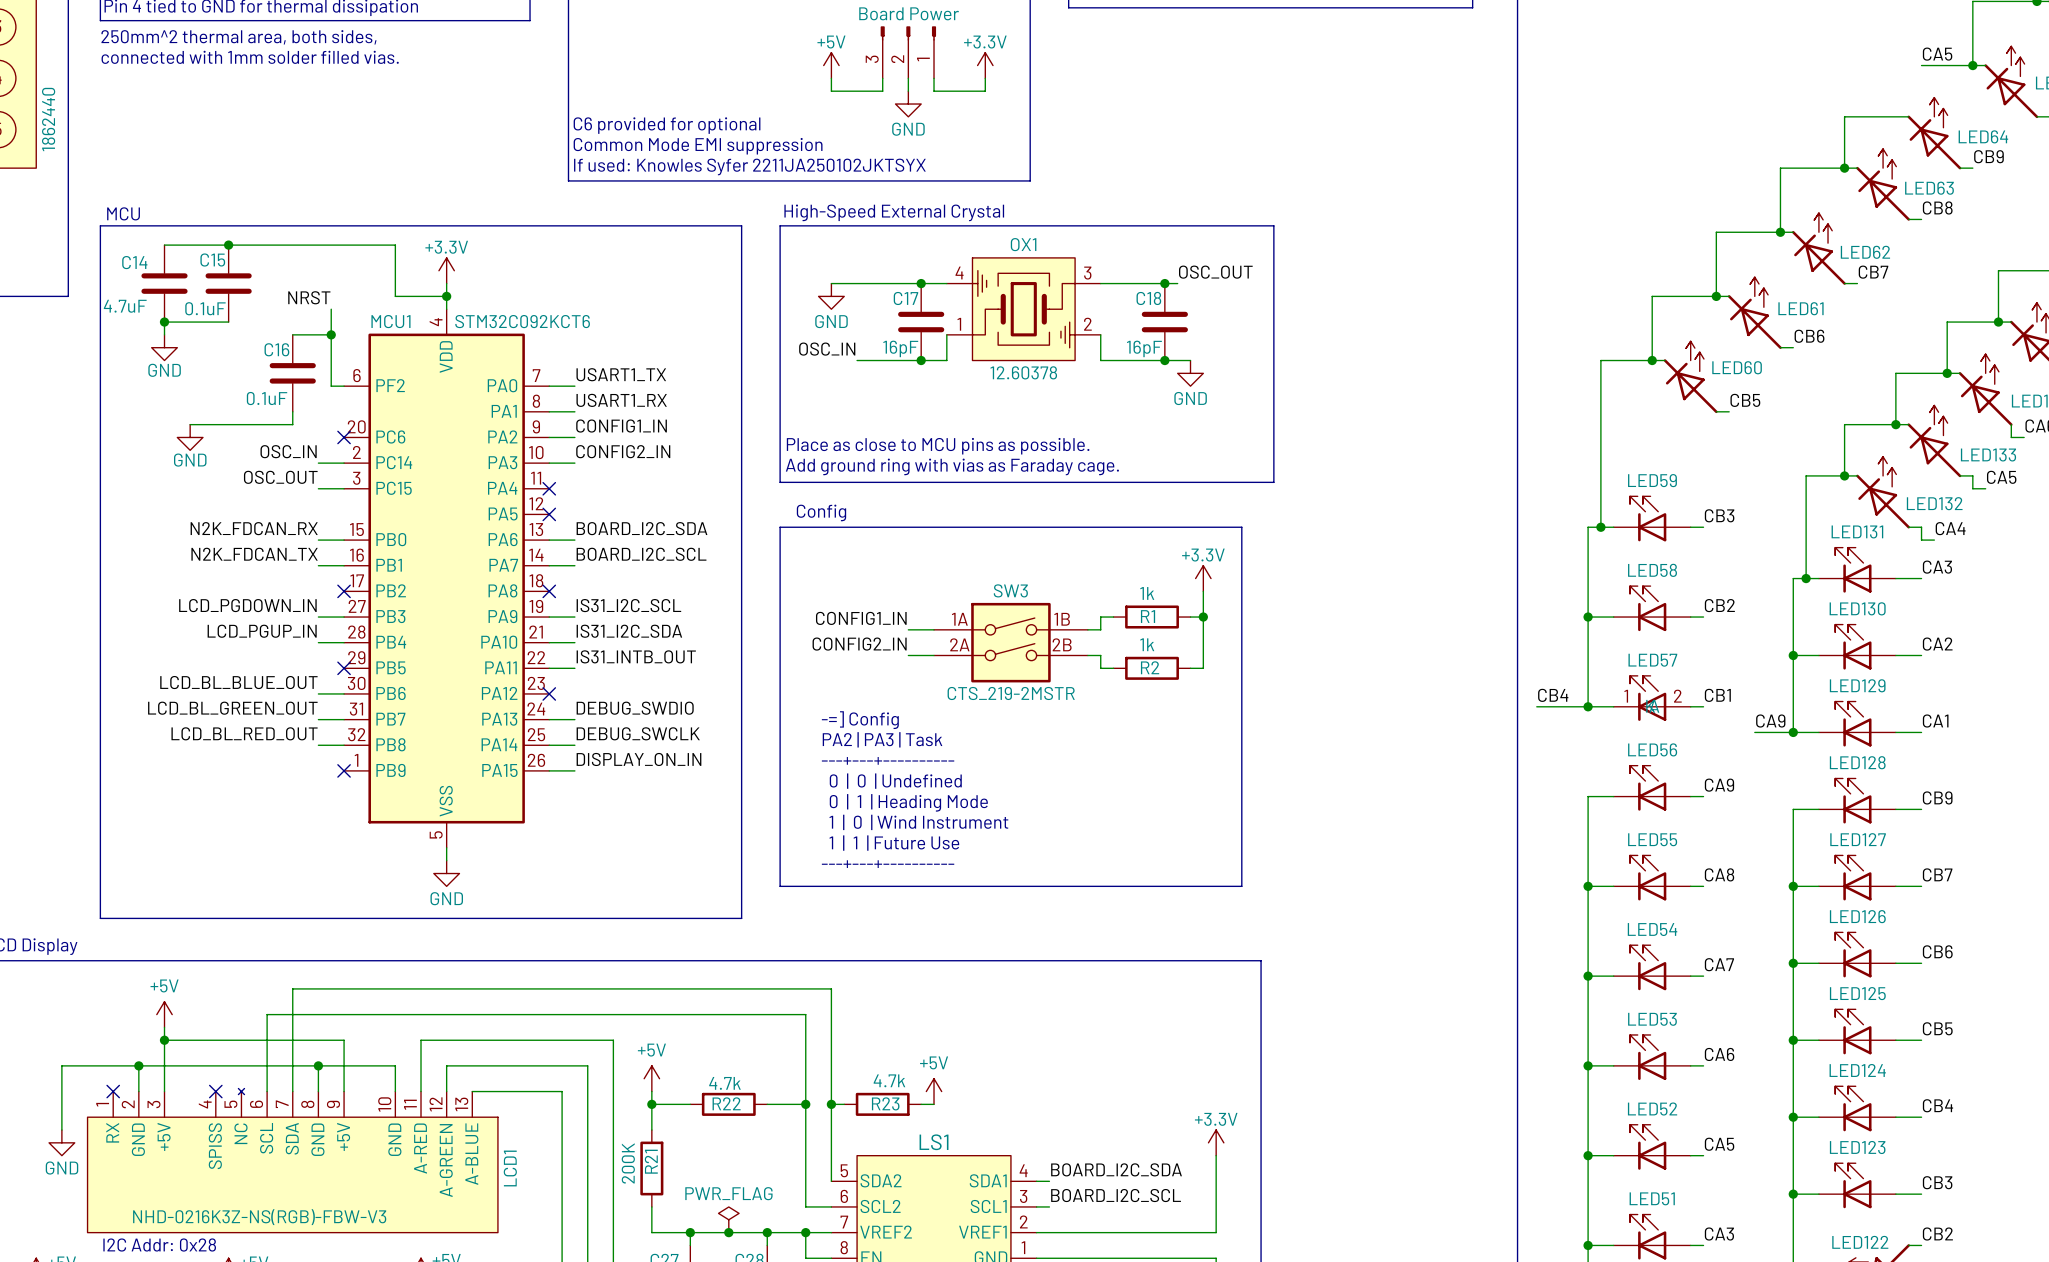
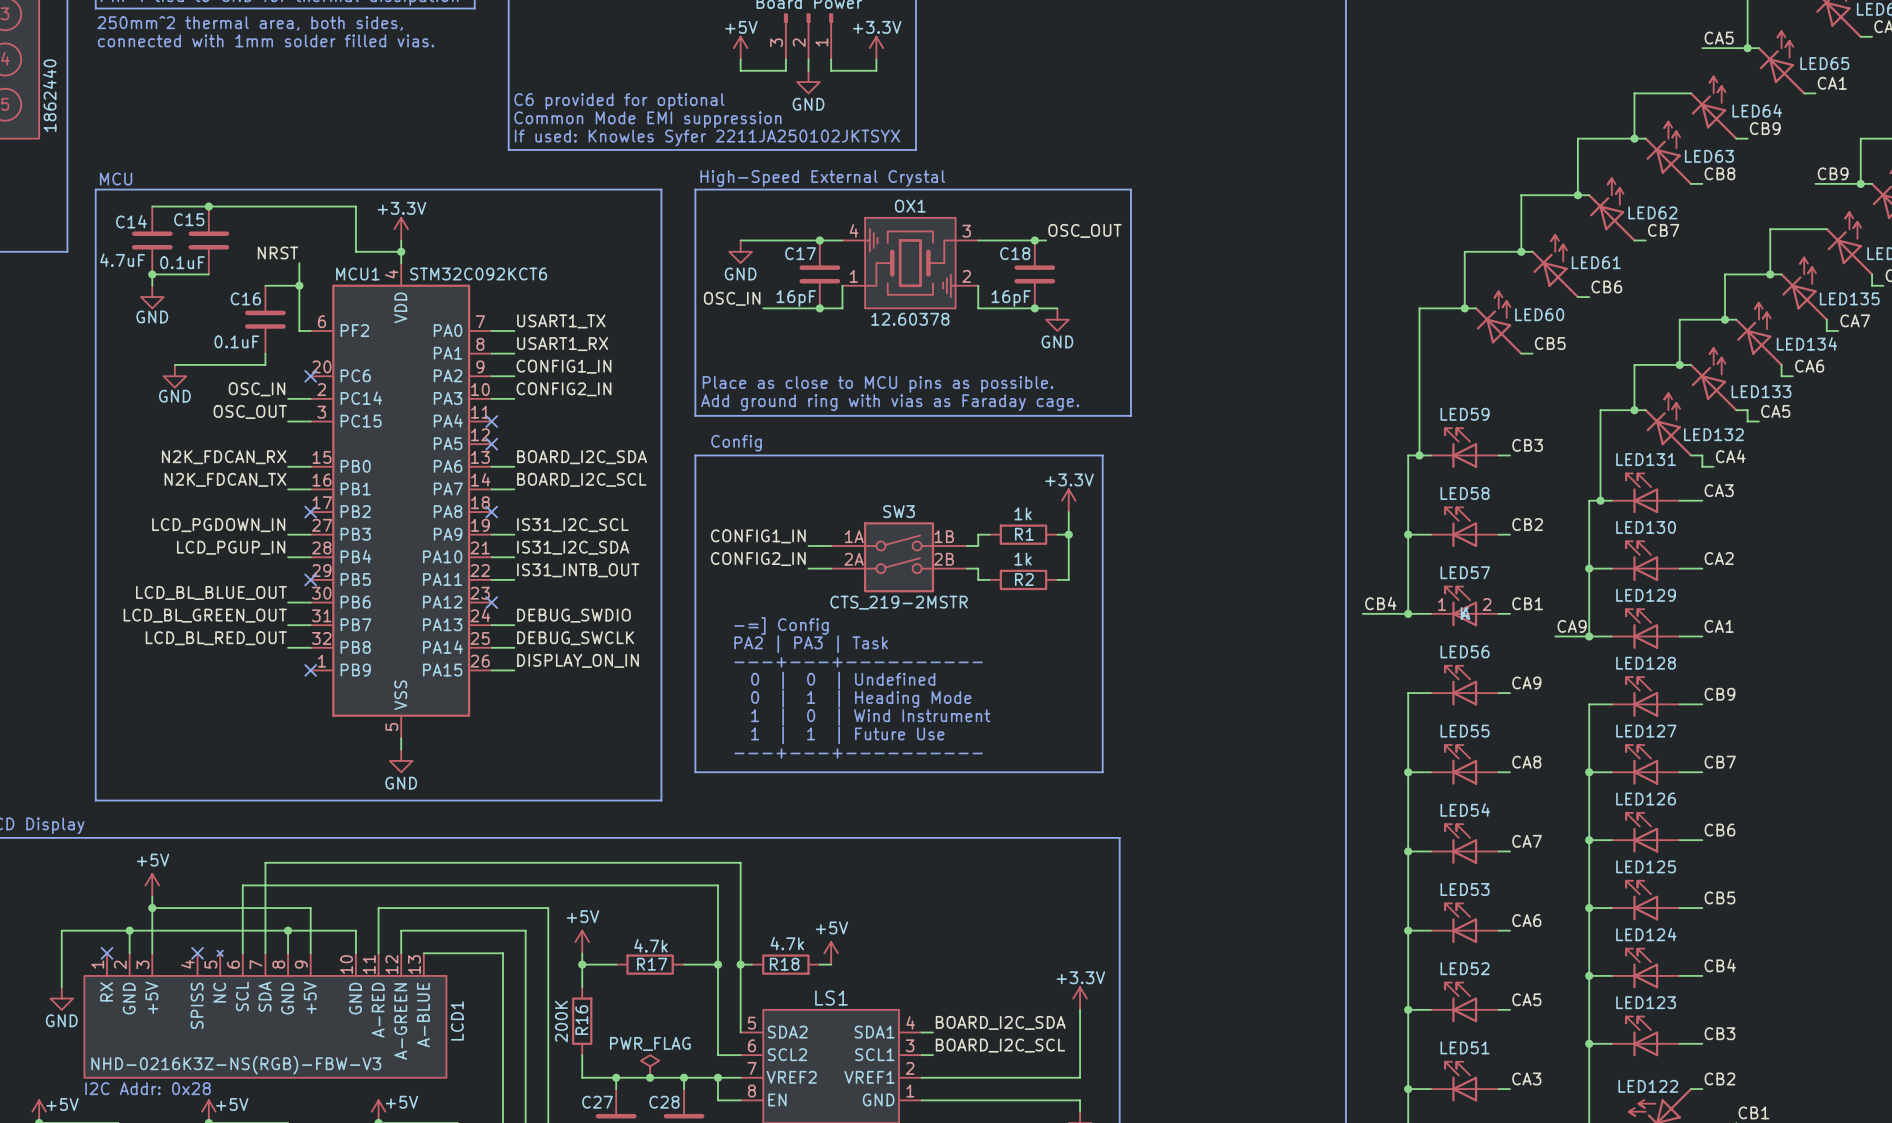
R22 name: R22 (726, 1103) -> R17 (652, 964)
R23 name: R23 (885, 1103) -> R18 (784, 964)
R21 name: R21 (651, 1161) -> R16 (581, 1020)

